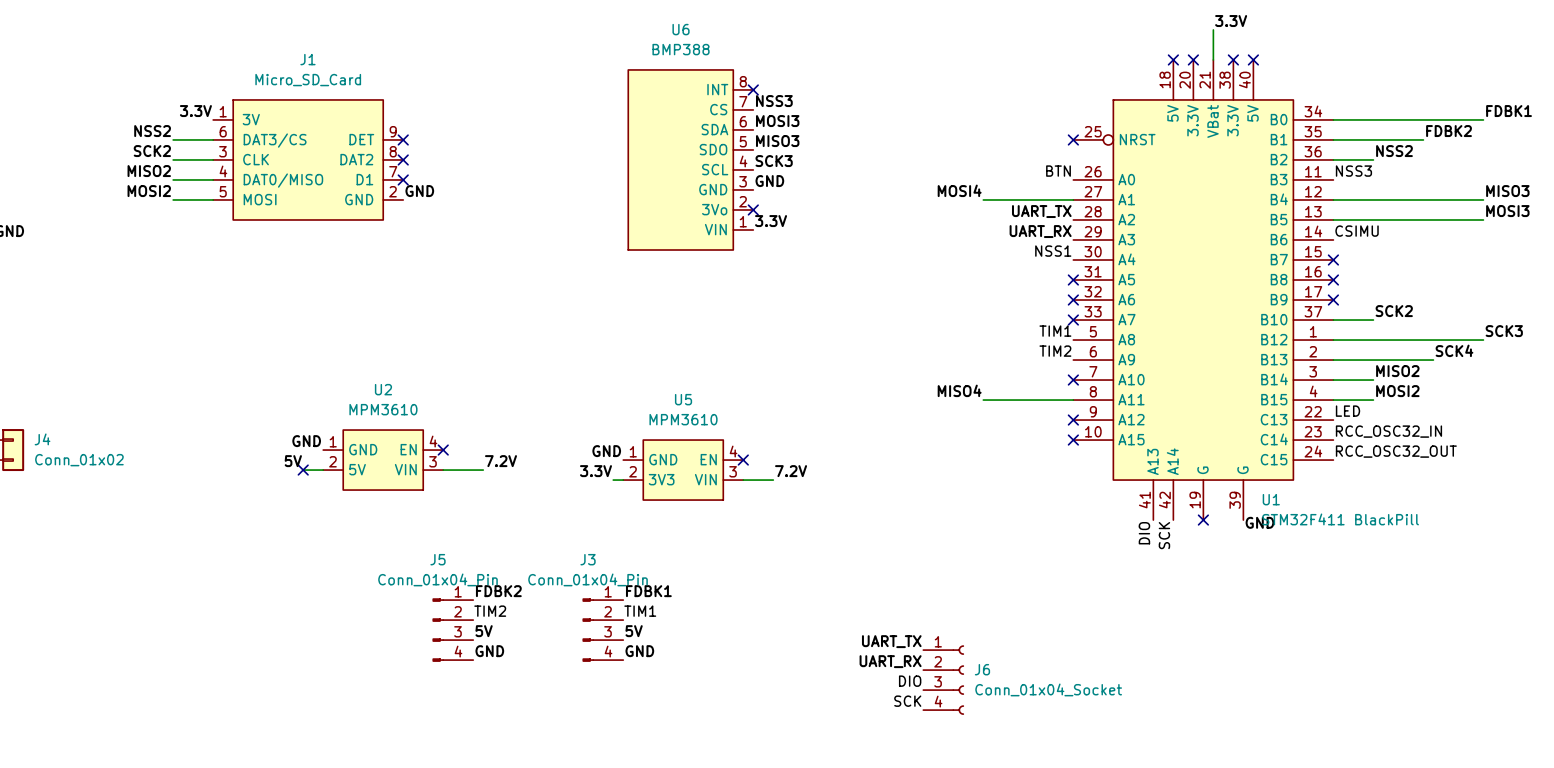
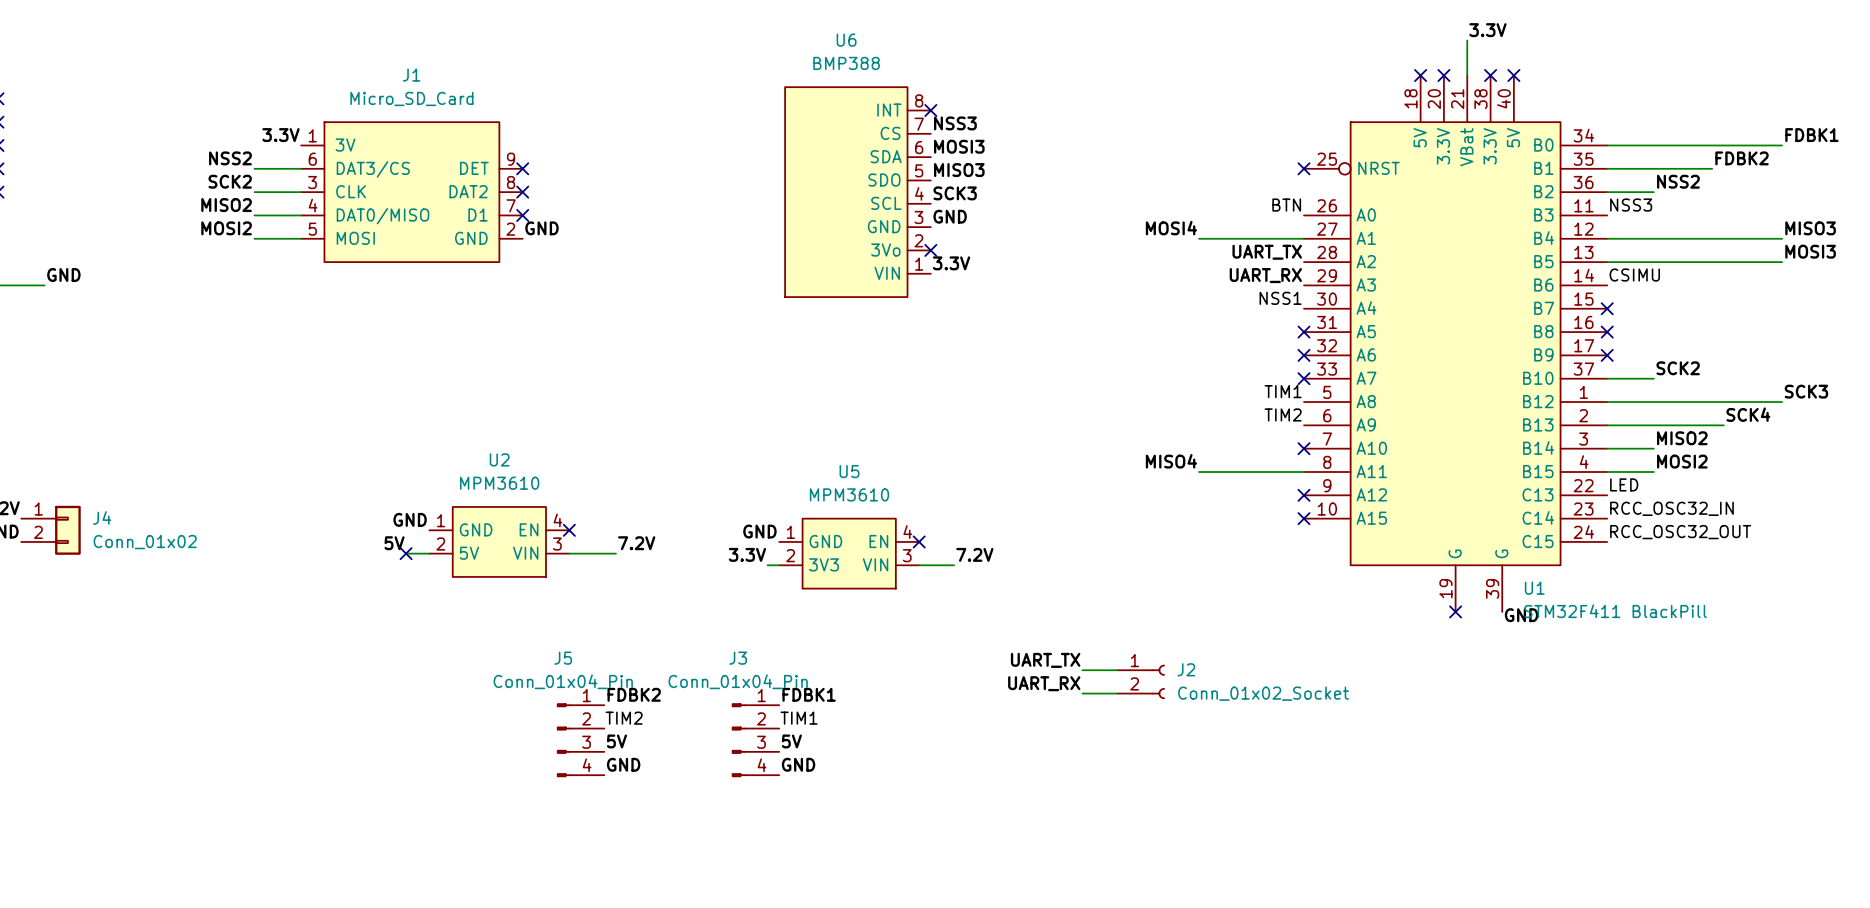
U1 symbol: [1073, 59, 1334, 521] -> [1304, 75, 1608, 612]
label: DIO (1144, 533) -> none
label: SCK (1164, 535) -> none
wire: none -> (1082, 670) (1117, 670)
J2: none -> Conn_01x02_Socket (1141, 681)
wire: none -> (1082, 693) (1117, 693)
label position: UART_TX (891, 641) -> UART_TX (1045, 660)
label position: UART_RX (890, 661) -> UART_RX (1044, 683)
J6: Conn_01x04_Socket (943, 680) -> none
label: DIO (910, 681) -> none
label: SCK (907, 701) -> none

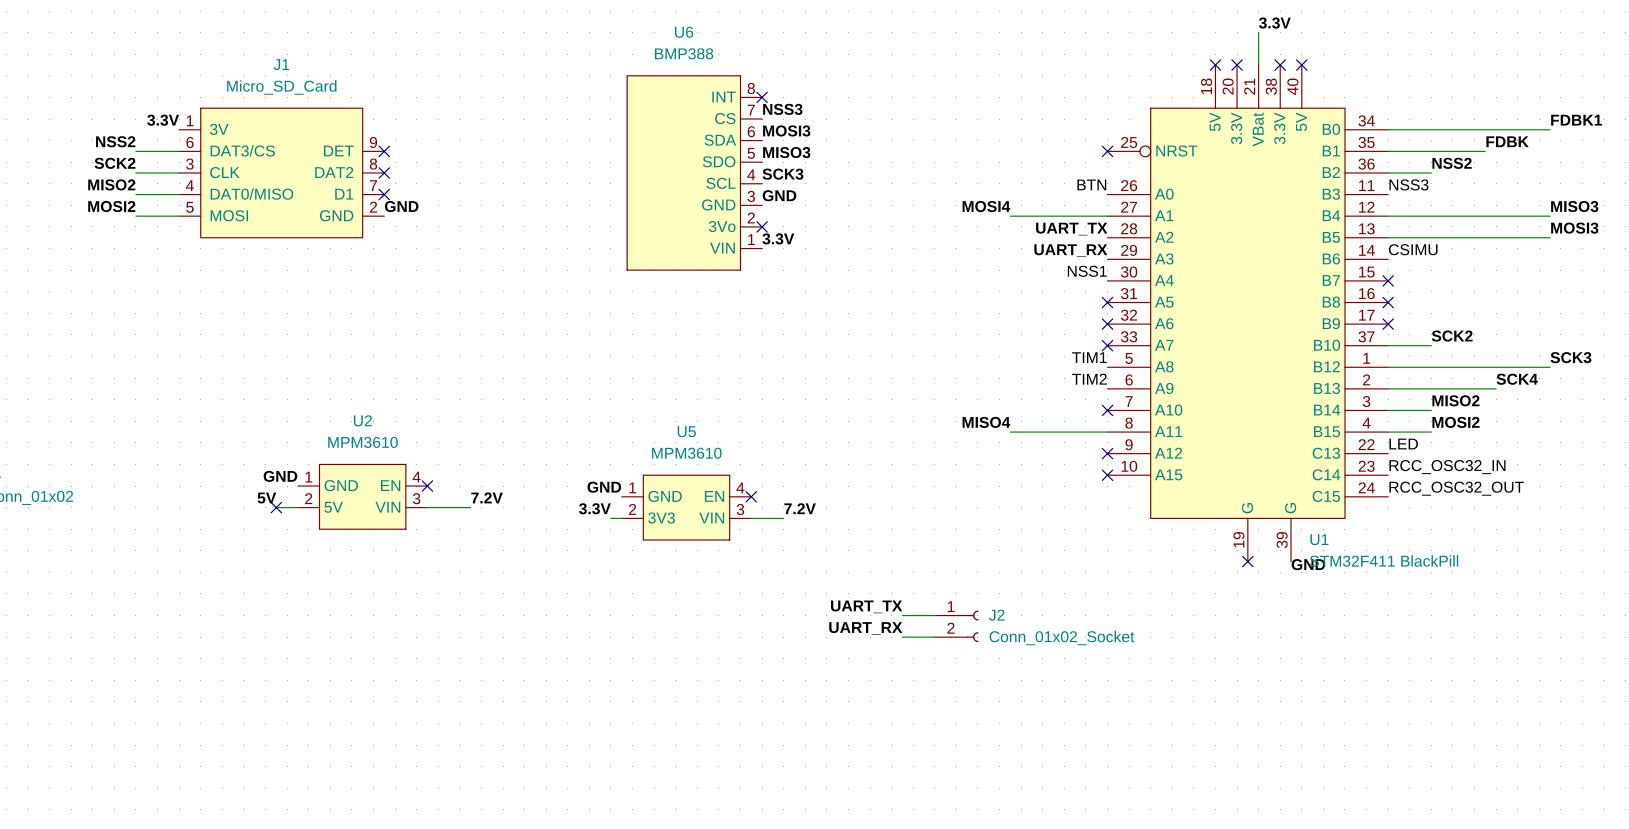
label: FDBK2 (1742, 158) -> FDBK (1507, 141)
label: FDBK2 (634, 694) -> none
label: FDBK1 (809, 694) -> none
label: TIM2 (624, 718) -> none
label: TIM1 (799, 718) -> none
J5: Conn_01x04_Pin (580, 740) -> none
J3: Conn_01x04_Pin (755, 740) -> none
label: 5V (616, 741) -> none
label: 5V (791, 741) -> none
label: GND (623, 764) -> none
label: GND (798, 764) -> none

